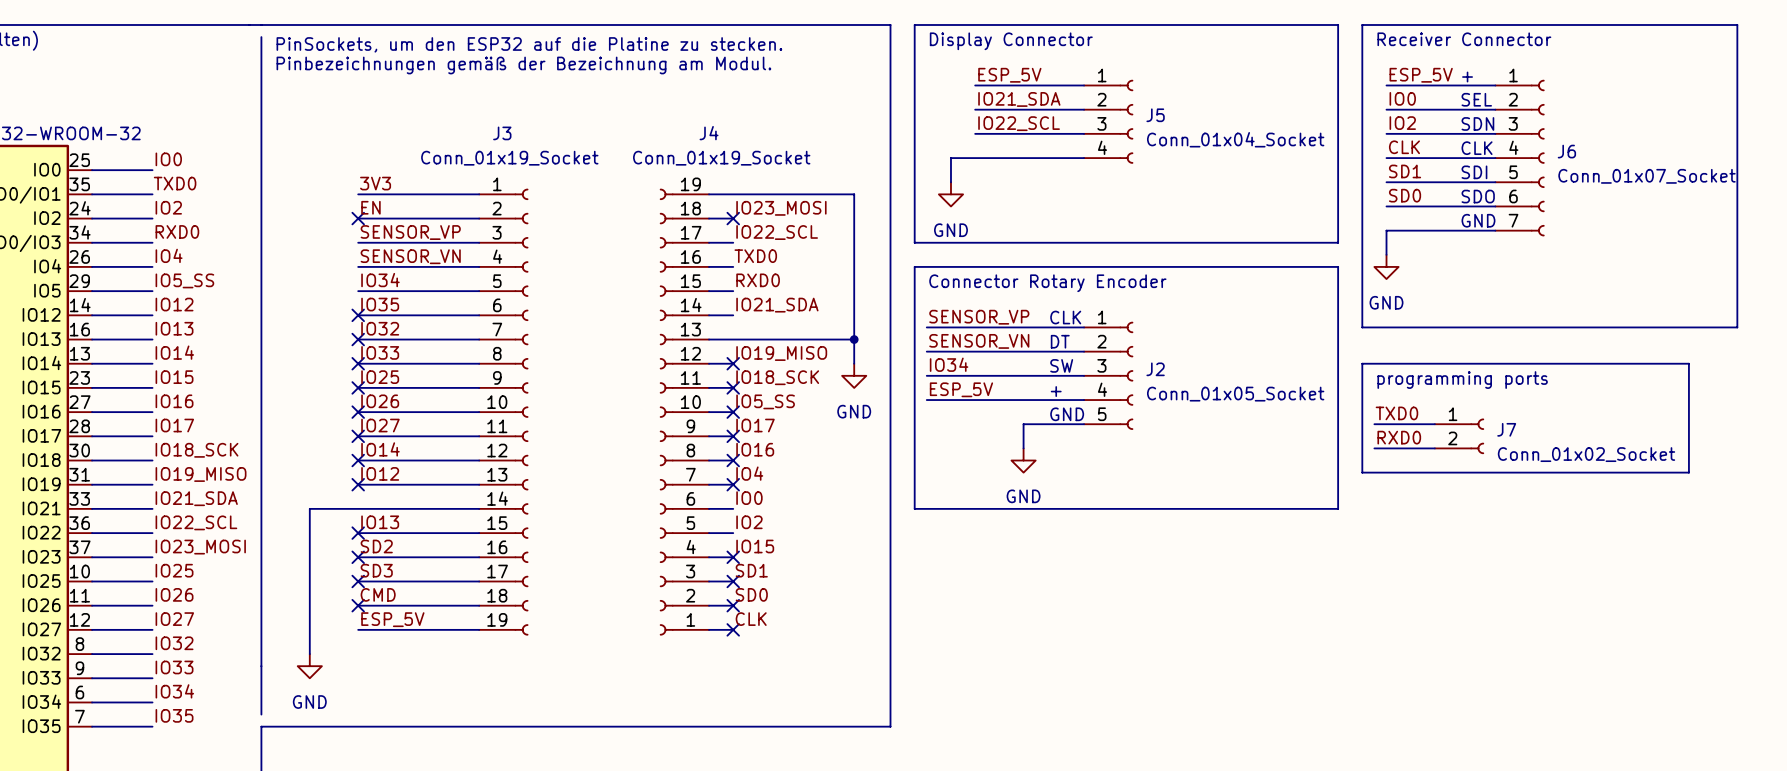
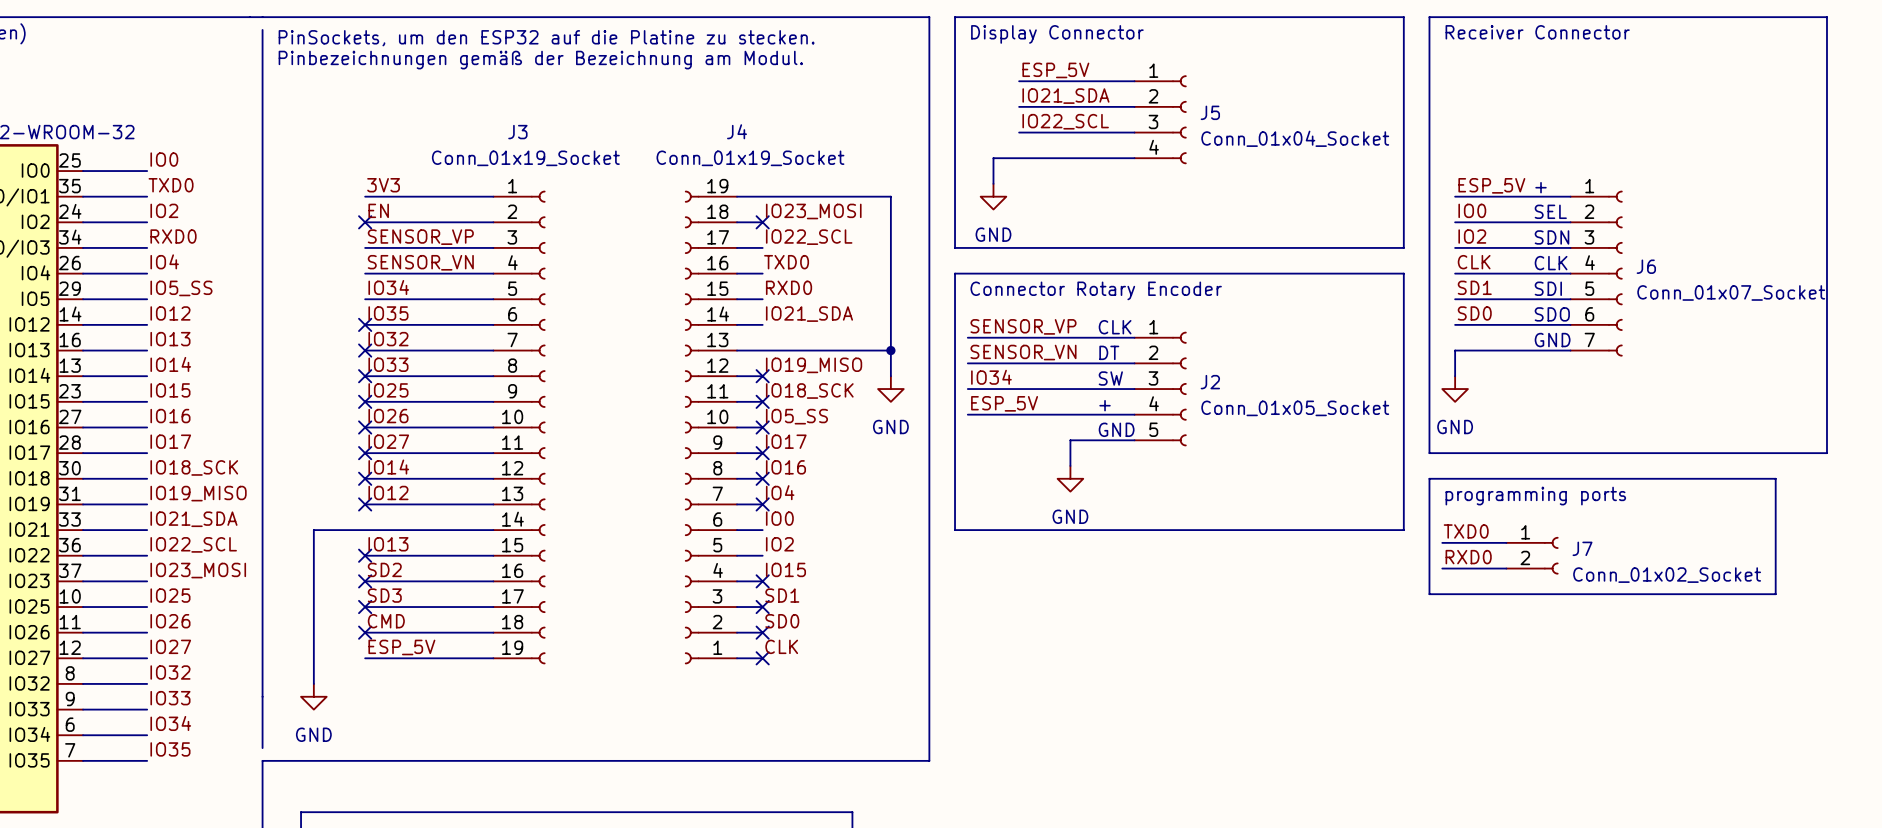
label position: ESP_5V (1421, 75) -> ESP_5V (1491, 185)
text position: + (1467, 77) -> + (1541, 187)
wire: (1386, 85) (1495, 85) -> (1455, 196) (1570, 196)
label position: IO0 (1402, 98) -> IO0 (1472, 210)
text position: SEL (1476, 99) -> SEL (1550, 211)
wire: (1386, 109) (1495, 109) -> (1455, 222) (1570, 222)
label position: IO2 (1402, 123) -> IO2 (1472, 236)
text position: SDN (1477, 123) -> SDN (1552, 237)
wire: (1386, 133) (1495, 133) -> (1455, 247) (1570, 247)
label position: CLK (1404, 147) -> CLK (1474, 262)
text position: CLK (1477, 148) -> CLK (1551, 263)
wire: (1386, 158) (1495, 158) -> (1455, 273) (1570, 273)
J6 position: (1519, 158) -> (1596, 273)
label position: SD1 (1405, 171) -> SD1 (1474, 287)
text position: SDI (1474, 172) -> SDI (1548, 288)
wire: (1386, 182) (1495, 182) -> (1455, 299) (1570, 299)
label position: SD0 (1405, 195) -> SD0 (1474, 313)
text position: SDO (1478, 196) -> SDO (1552, 314)
wire: (1386, 206) (1495, 206) -> (1455, 324) (1570, 324)
text position: GND (1478, 220) -> GND (1552, 340)
wire: (1495, 230) (1386, 230) (1386, 254) -> (1570, 350) (1455, 350) (1455, 376)
power symbol position: GND (1386, 266) -> GND (1455, 389)
line: (1362, 327) (1737, 327) -> (1429, 453) (1826, 453) (1826, 337)
line: none -> (1429, 337) (1429, 376)
line: (1362, 363) (1688, 363) (1688, 460) -> (1429, 478) (1775, 478)
text position: programming ports (1462, 380) -> programming ports (1535, 496)
label position: TXD0 (1396, 413) -> TXD0 (1466, 531)
wire: (1374, 424) (1434, 424) -> (1442, 542) (1506, 542)
line: (1362, 436) (1362, 460) -> none
J7 position: (1459, 436) -> (1532, 555)
label position: RXD0 (1399, 437) -> RXD0 (1468, 557)
wire: (1374, 448) (1434, 448) -> (1442, 568) (1506, 568)
line: (1362, 472) (1688, 472) -> (1429, 491) (1429, 594) (1775, 594) (1775, 491)

